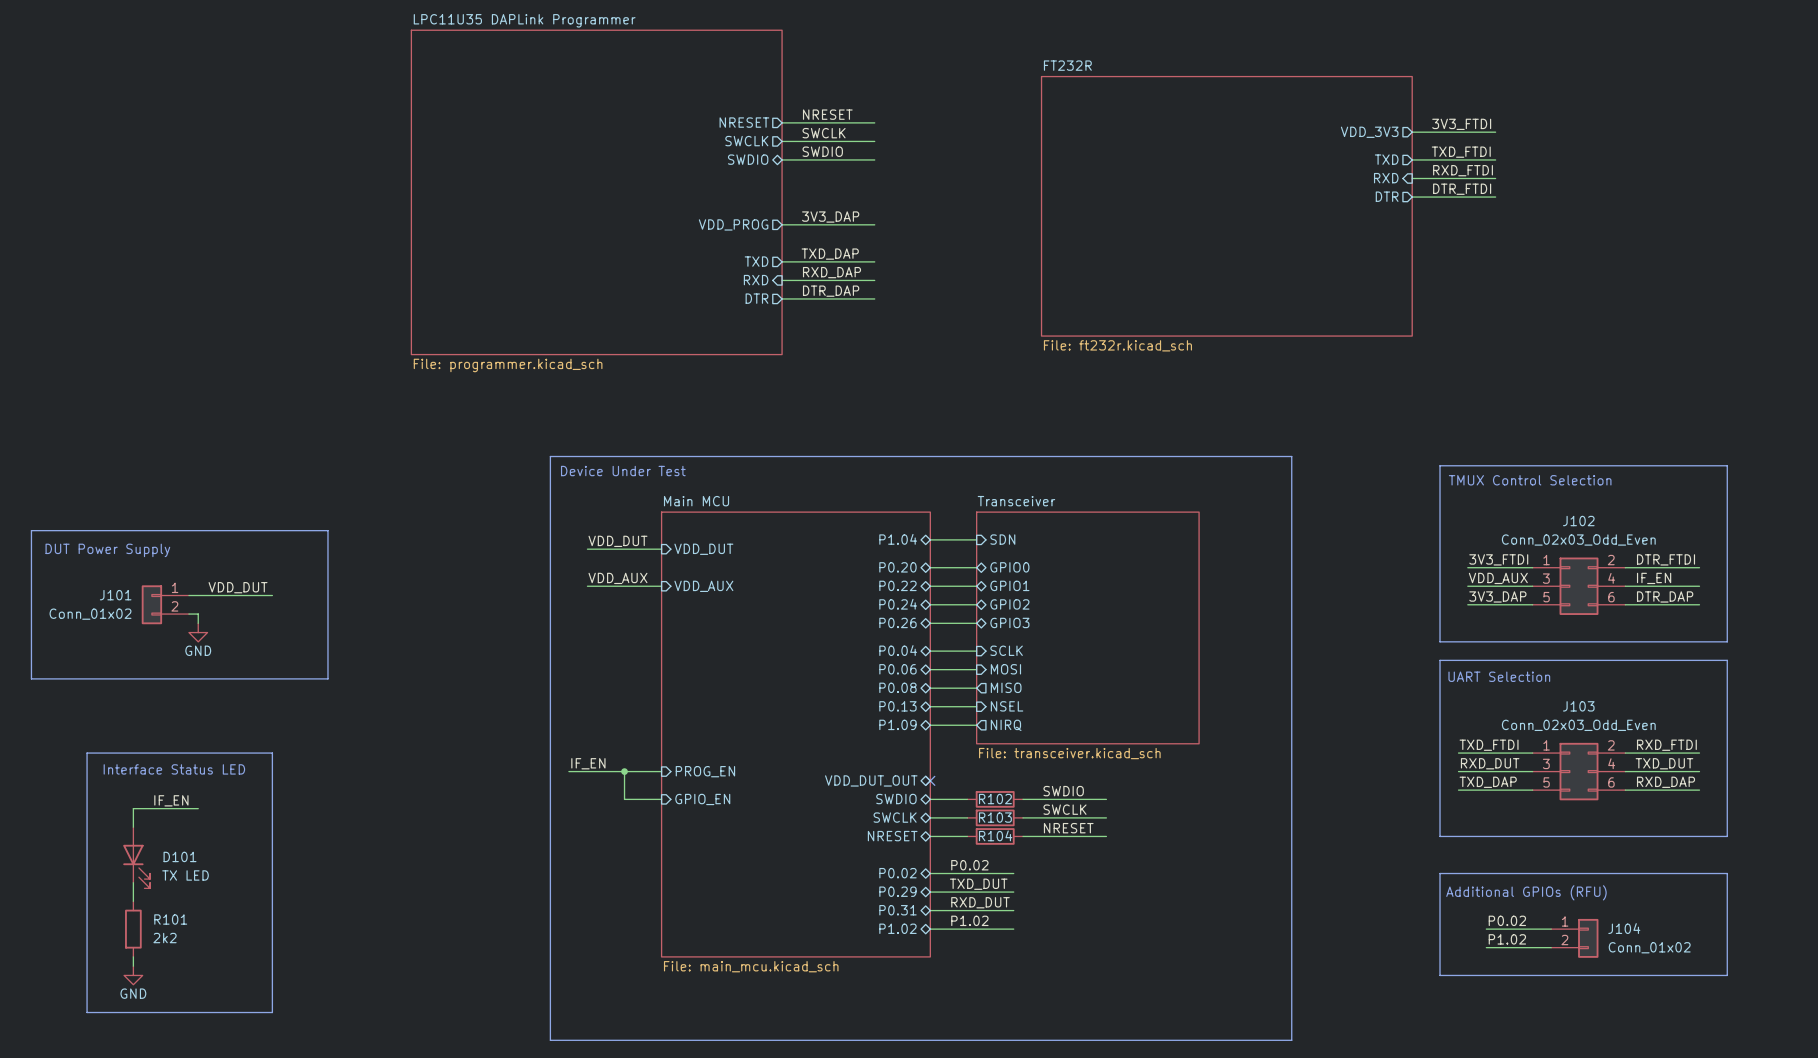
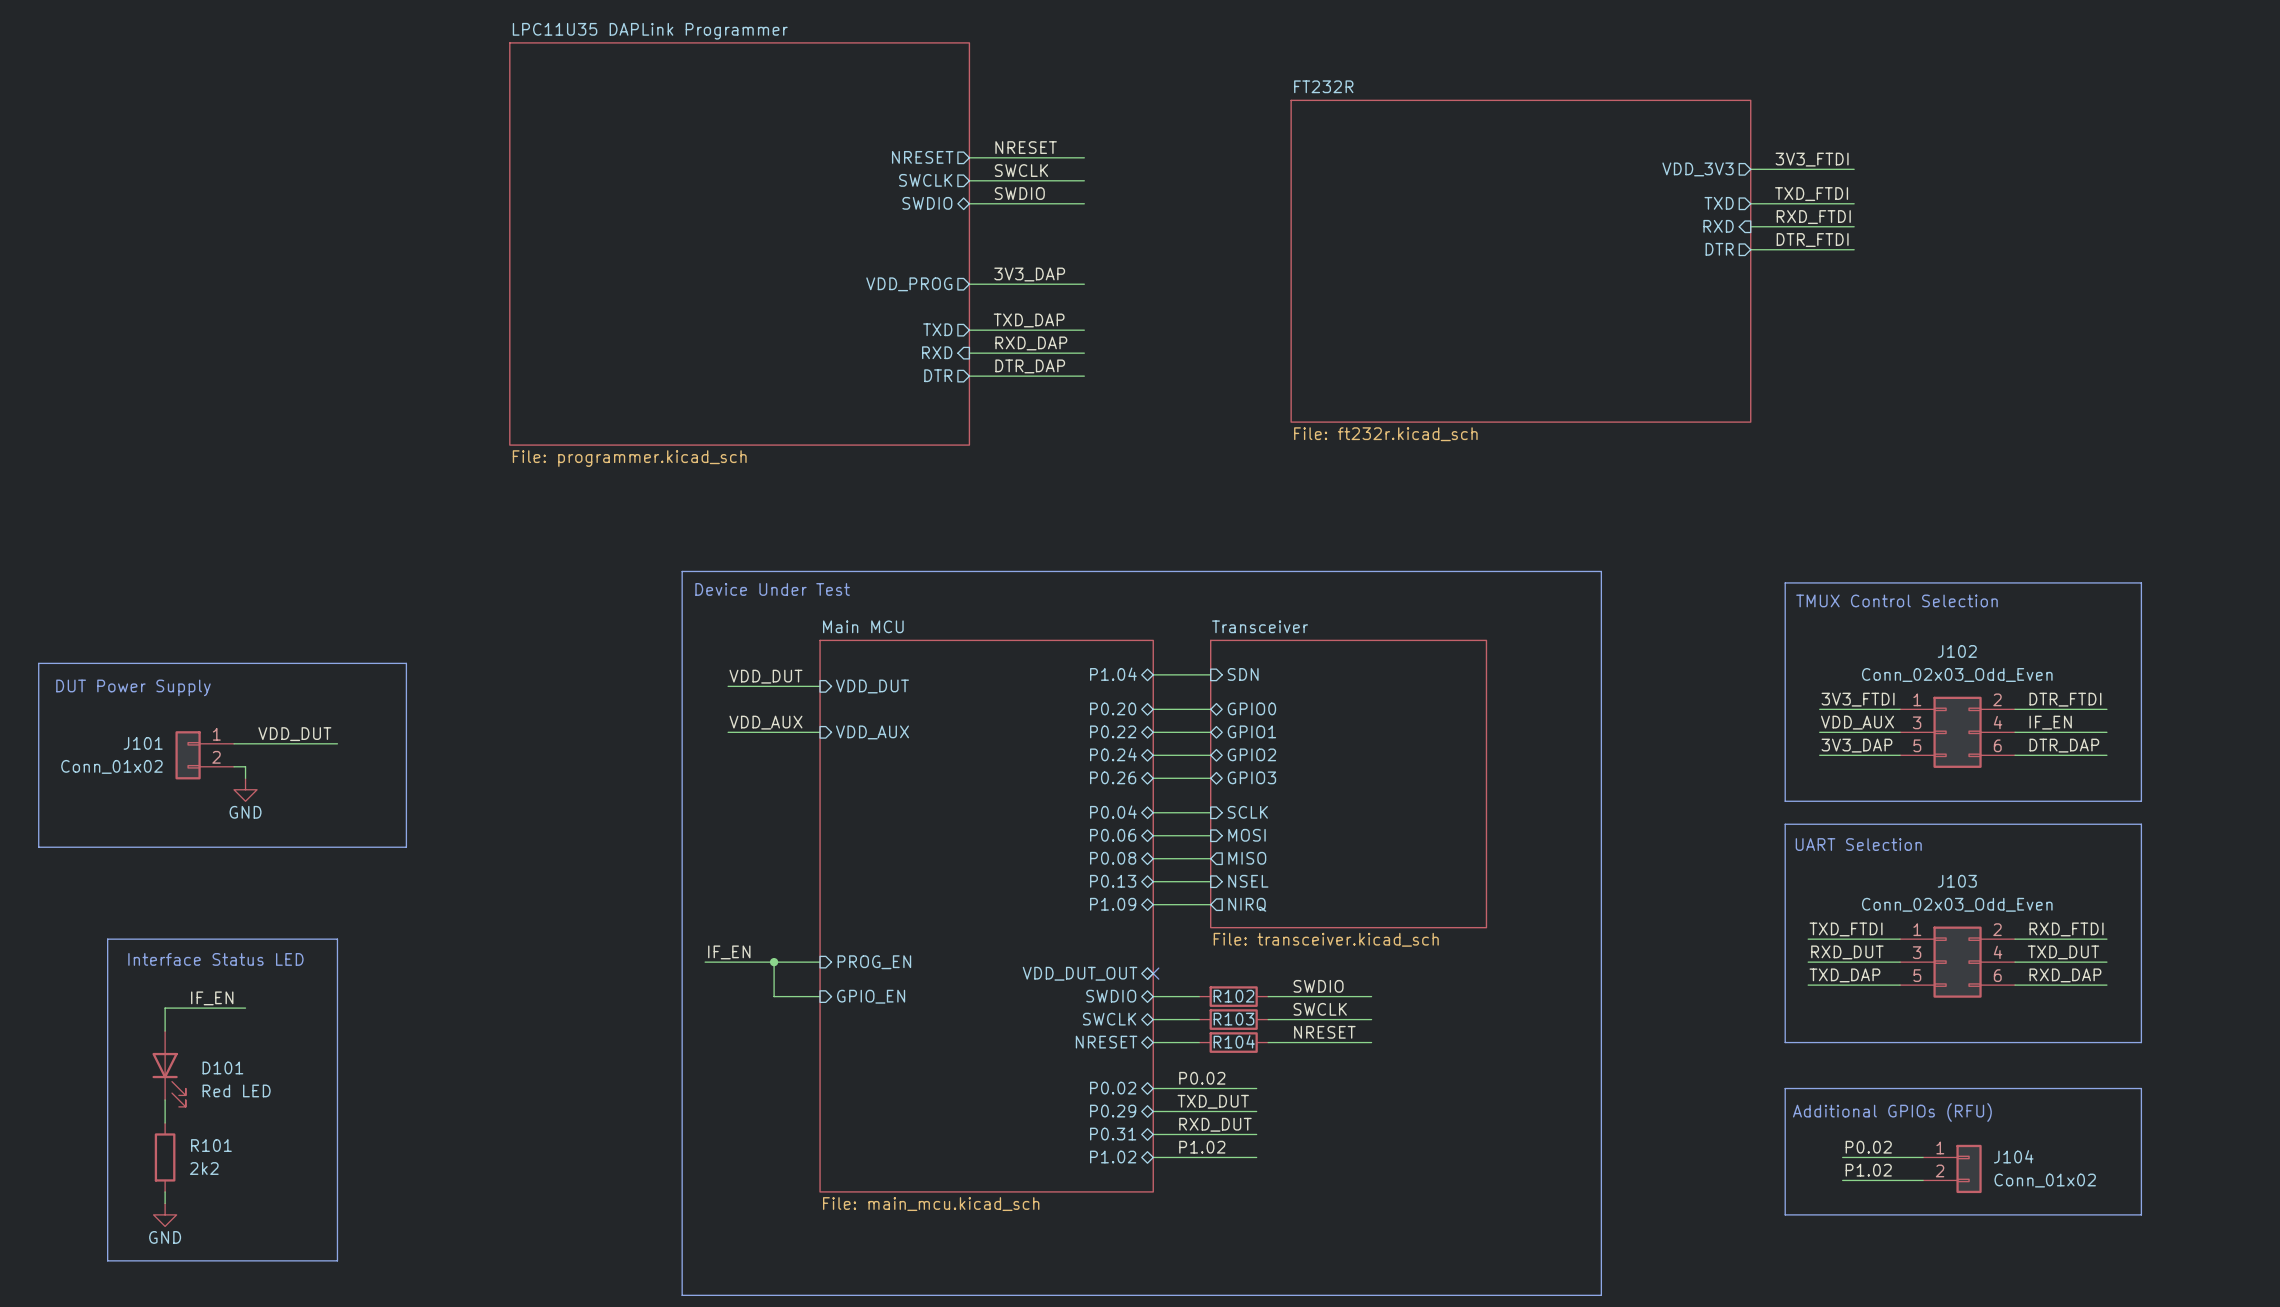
D101 value: TX LED (185, 875) -> Red LED (236, 1090)

